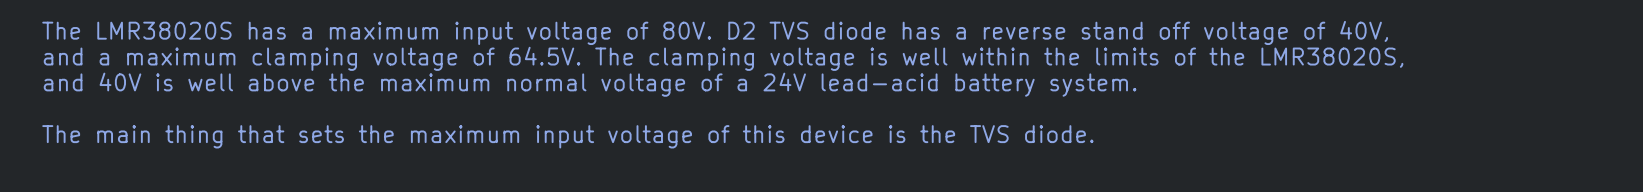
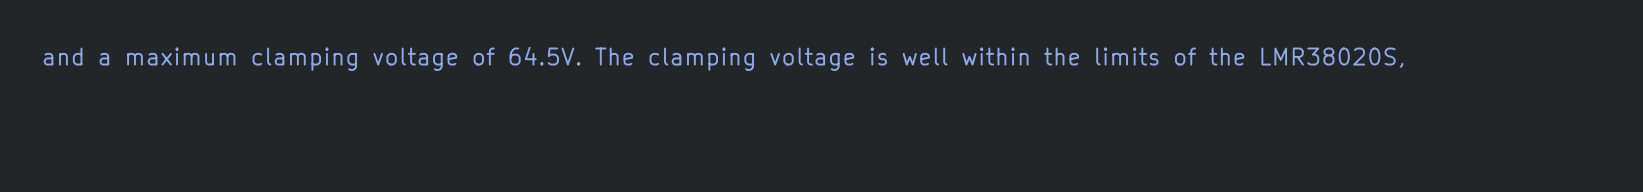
text: The LMR38020S has a maximum input voltage of 80V. D2 TVS diode has a reverse stand off voltage of 40V, (715, 32) -> none
text: and 40V is well above the maximum normal voltage of a 24V lead-acid battery system. (590, 84) -> none
text: The main thing that sets the maximum input voltage of this device is the TVS diode. (567, 136) -> none

